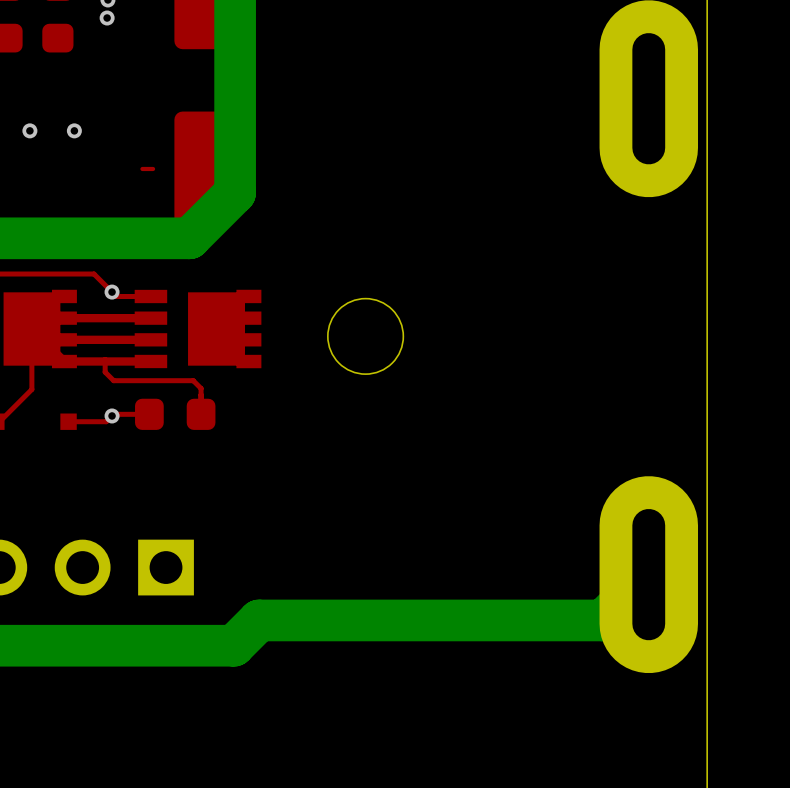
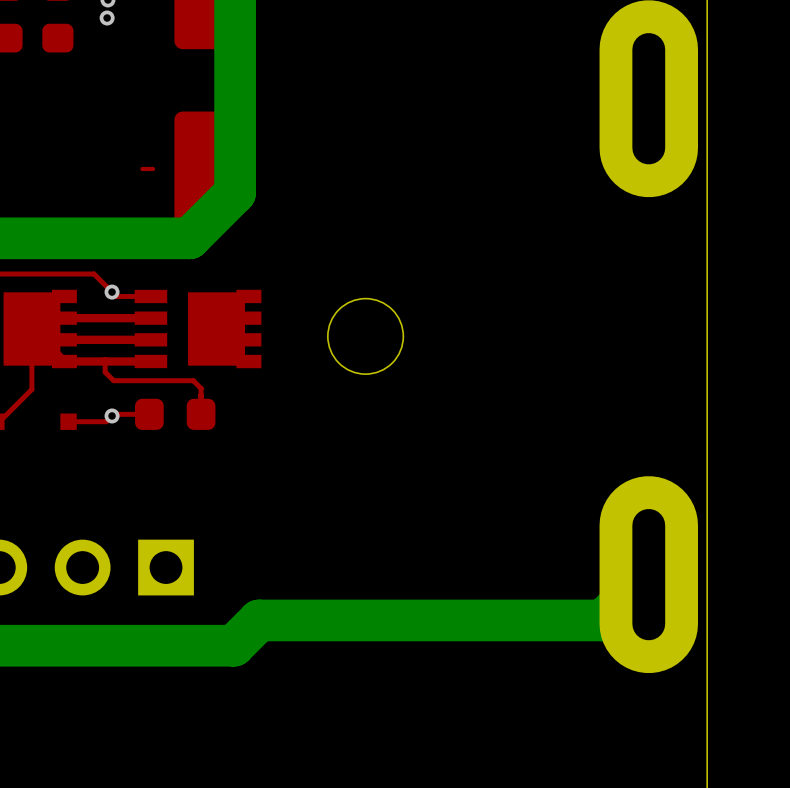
via: (29, 130) -> none
via: (74, 130) -> none

